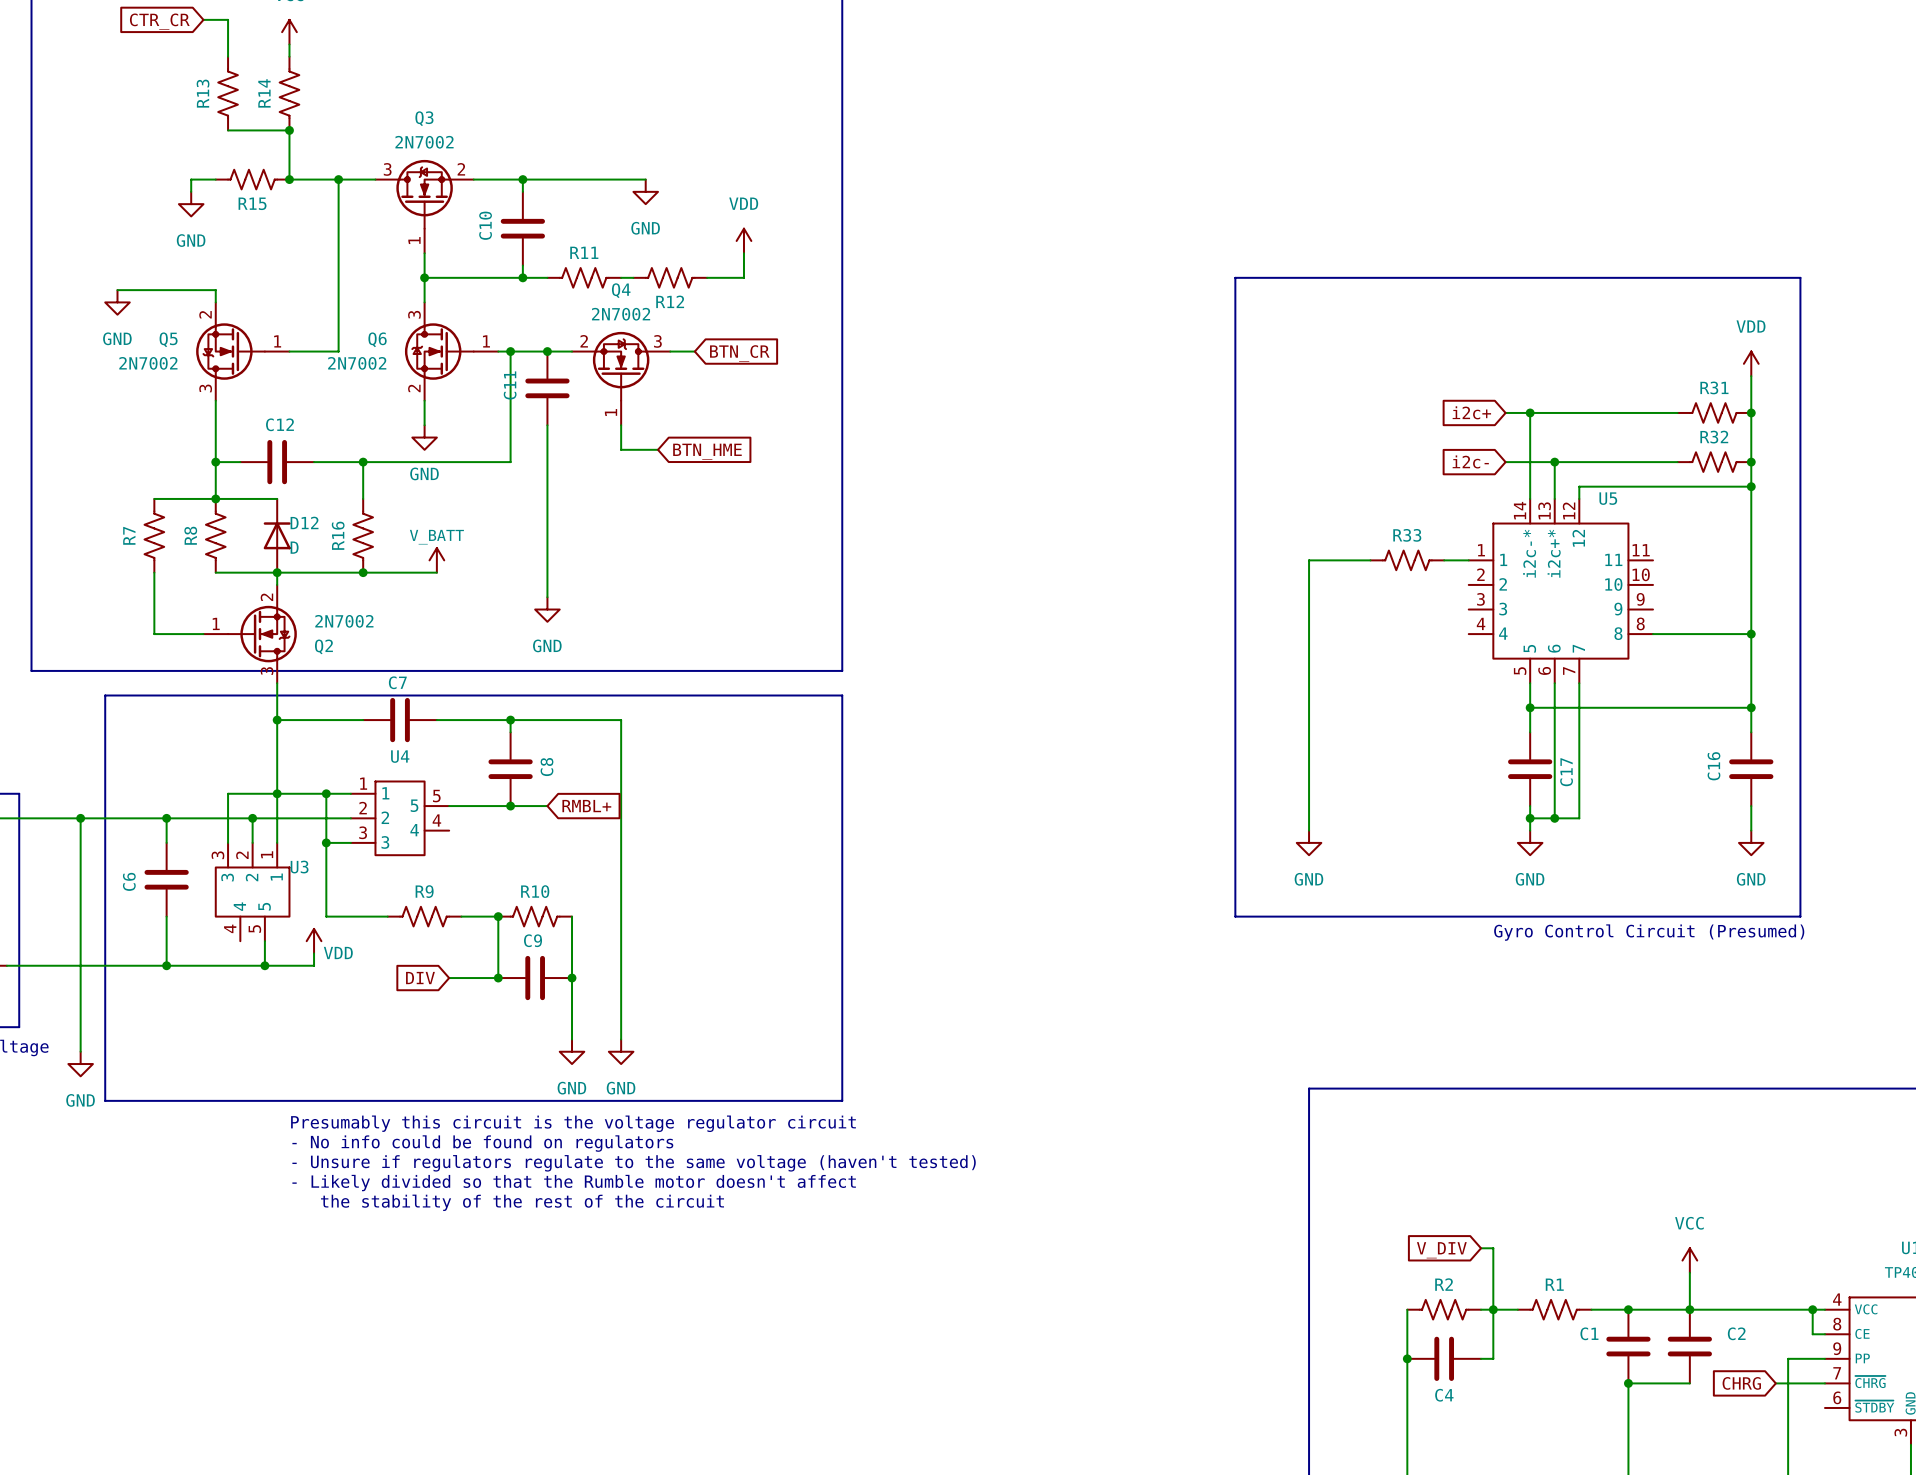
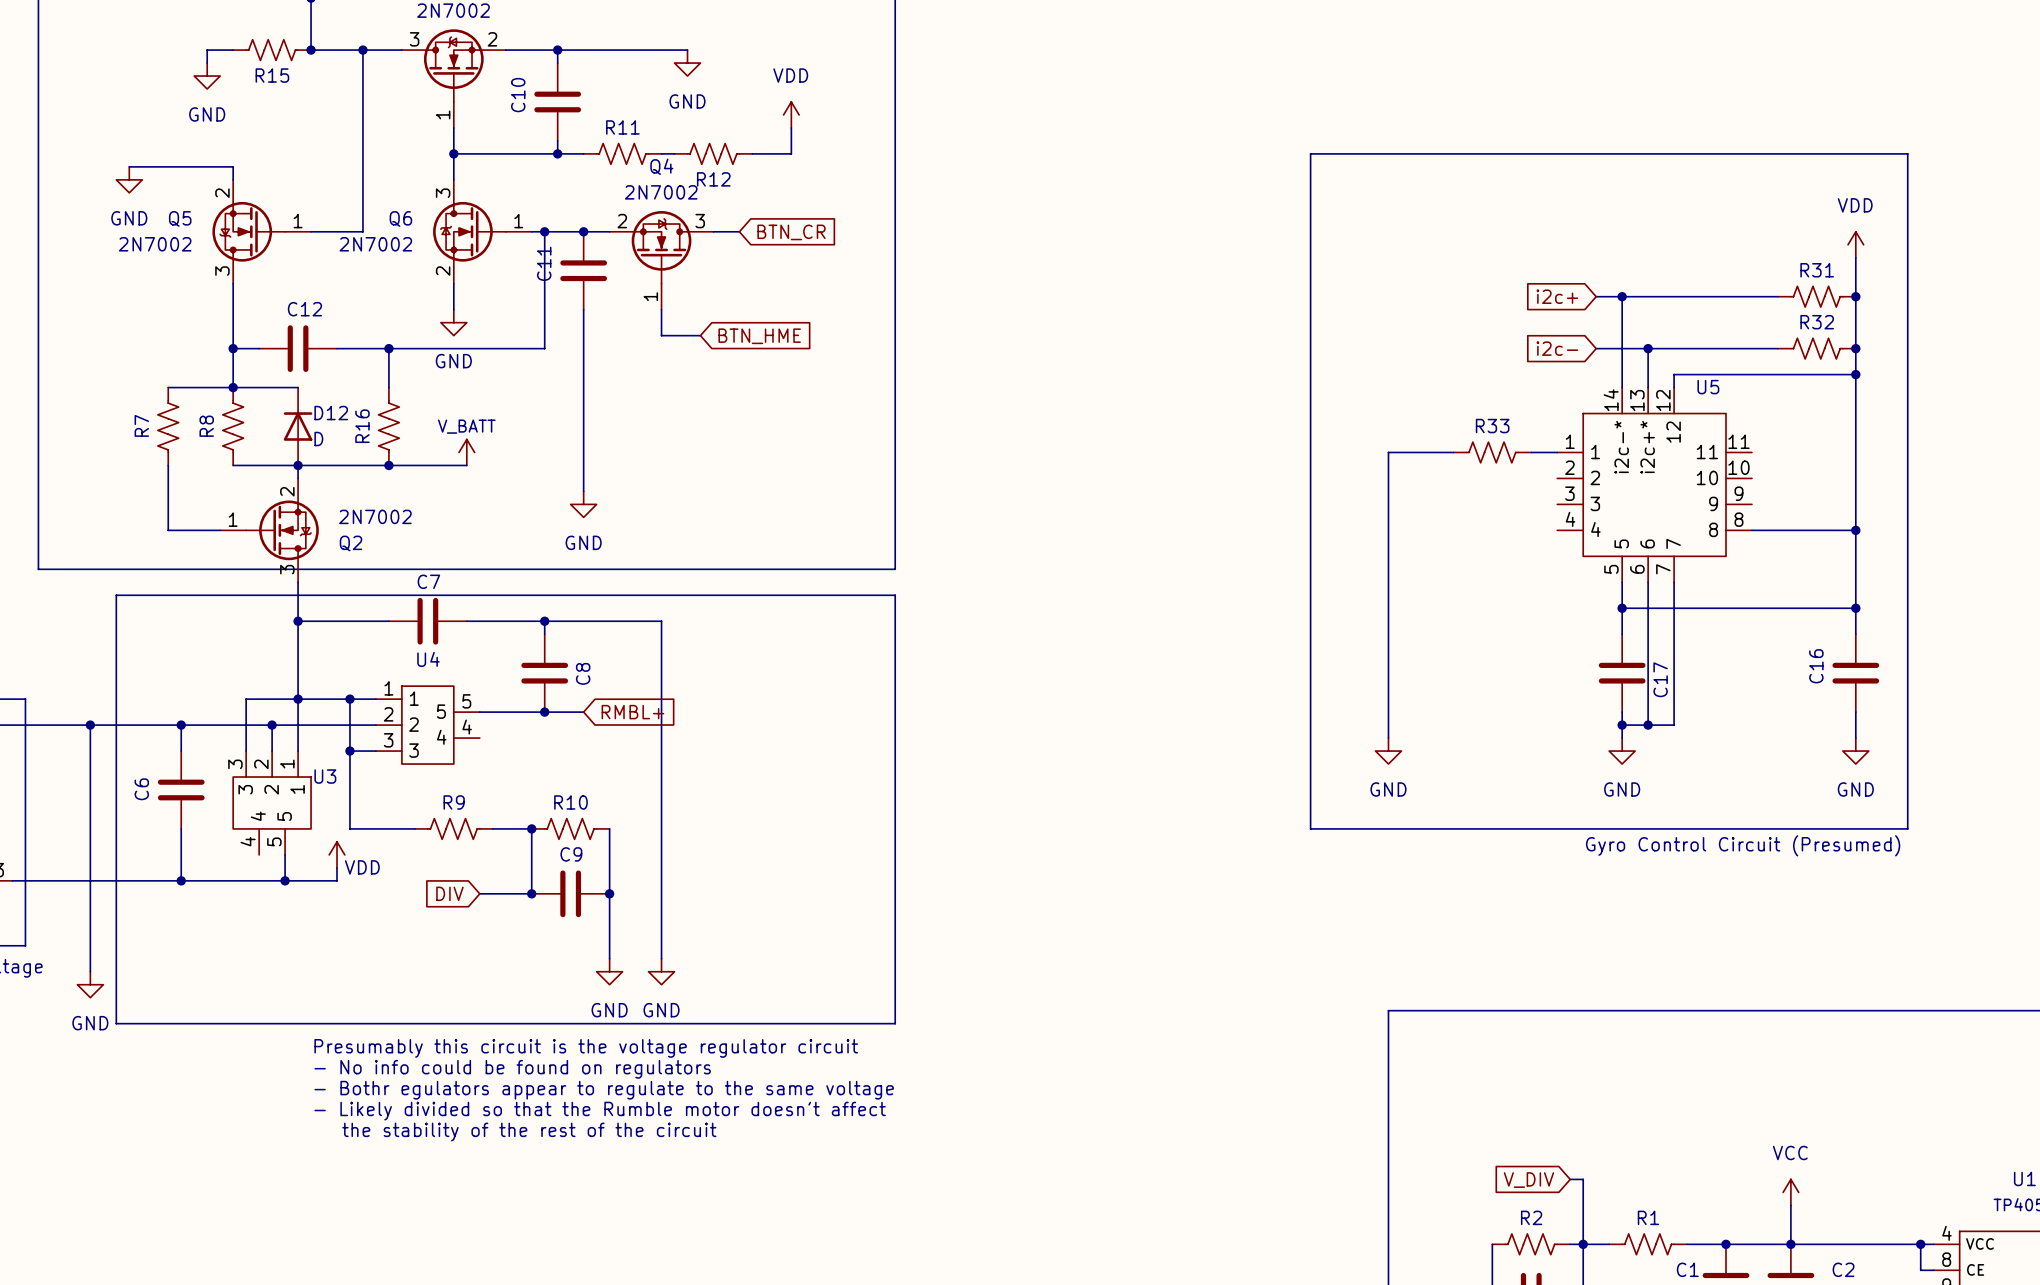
text: - Unsure if regulators regulate to the same voltage (haven't tested) (634, 1163) -> - Bothr egulators appear to regulate to the same voltage (604, 1090)

